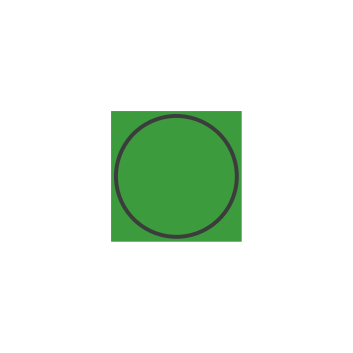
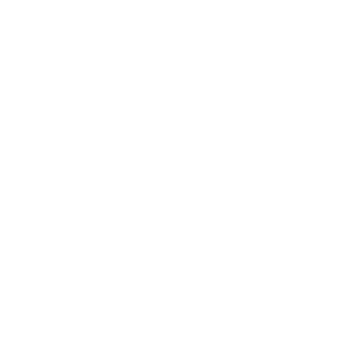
part: (176, 176) -> none

